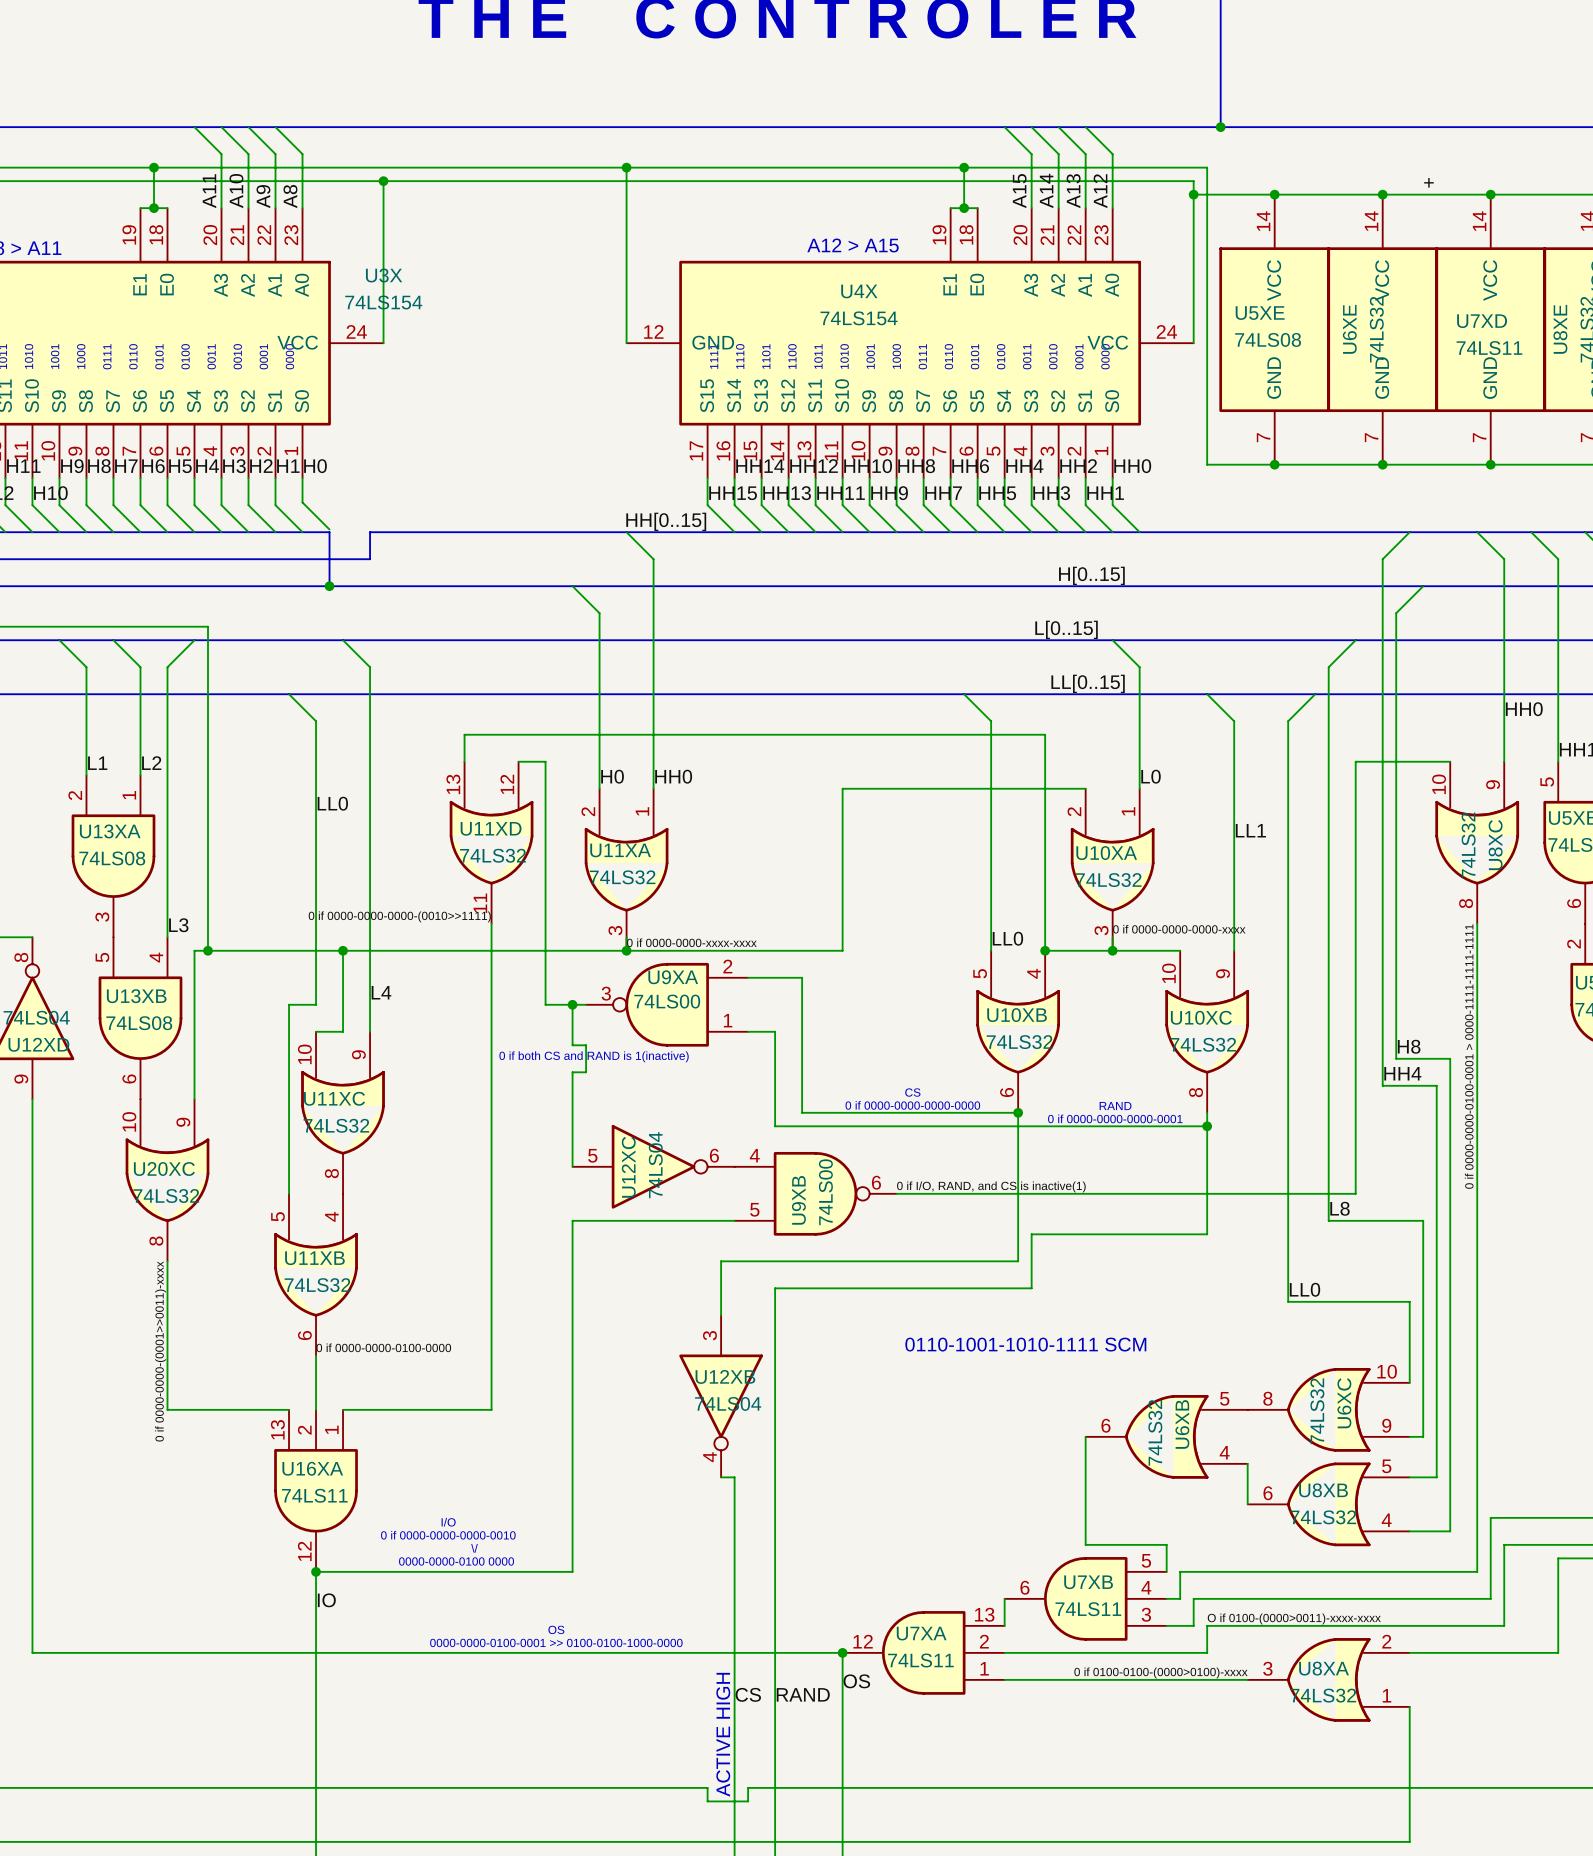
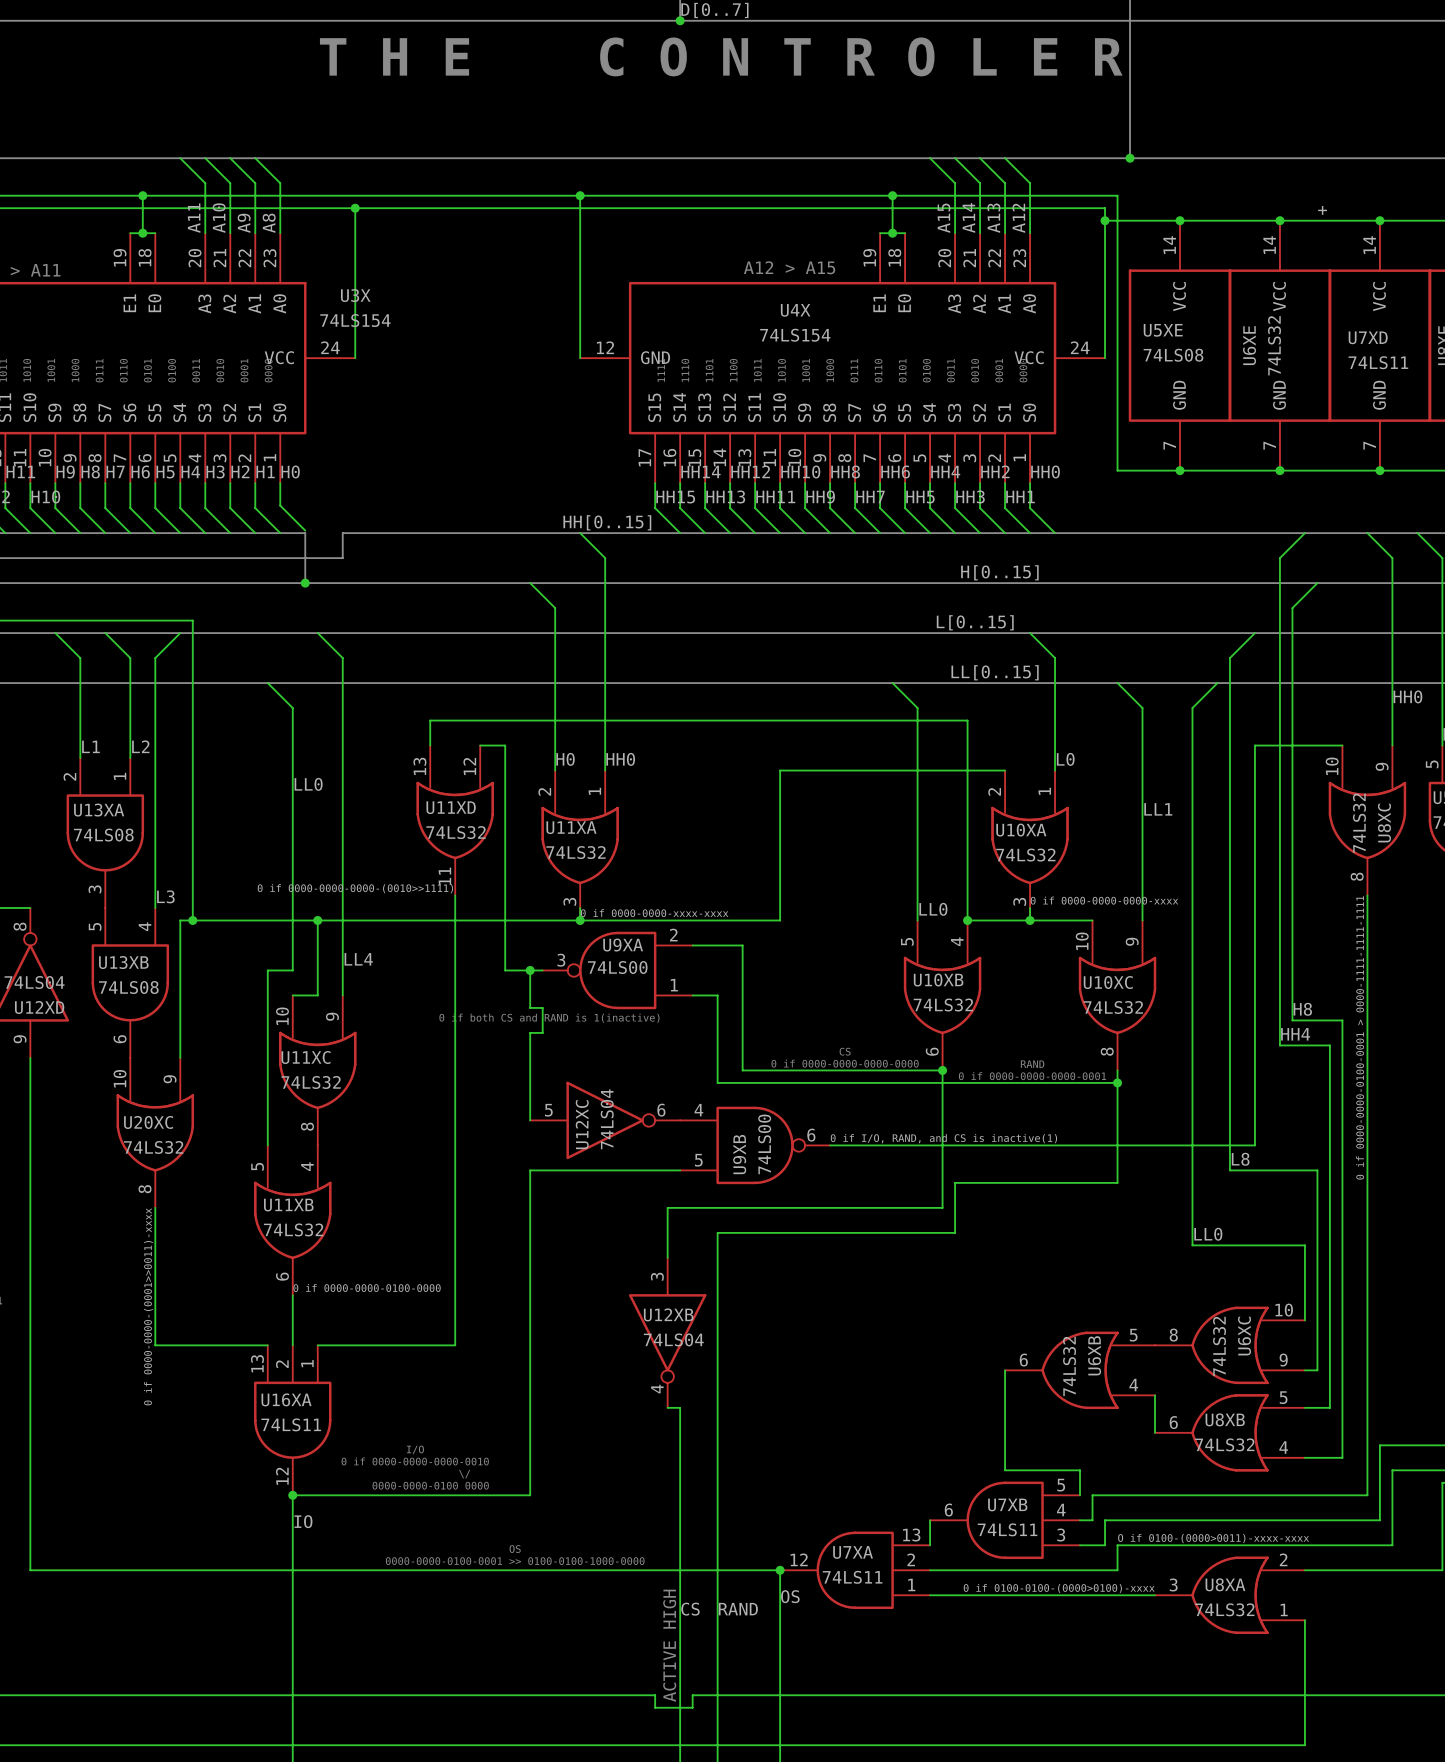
label: L4 (381, 992) -> LL4 (358, 959)
text: 0110-1001-1010-1111 SCM (1025, 1344) -> none

